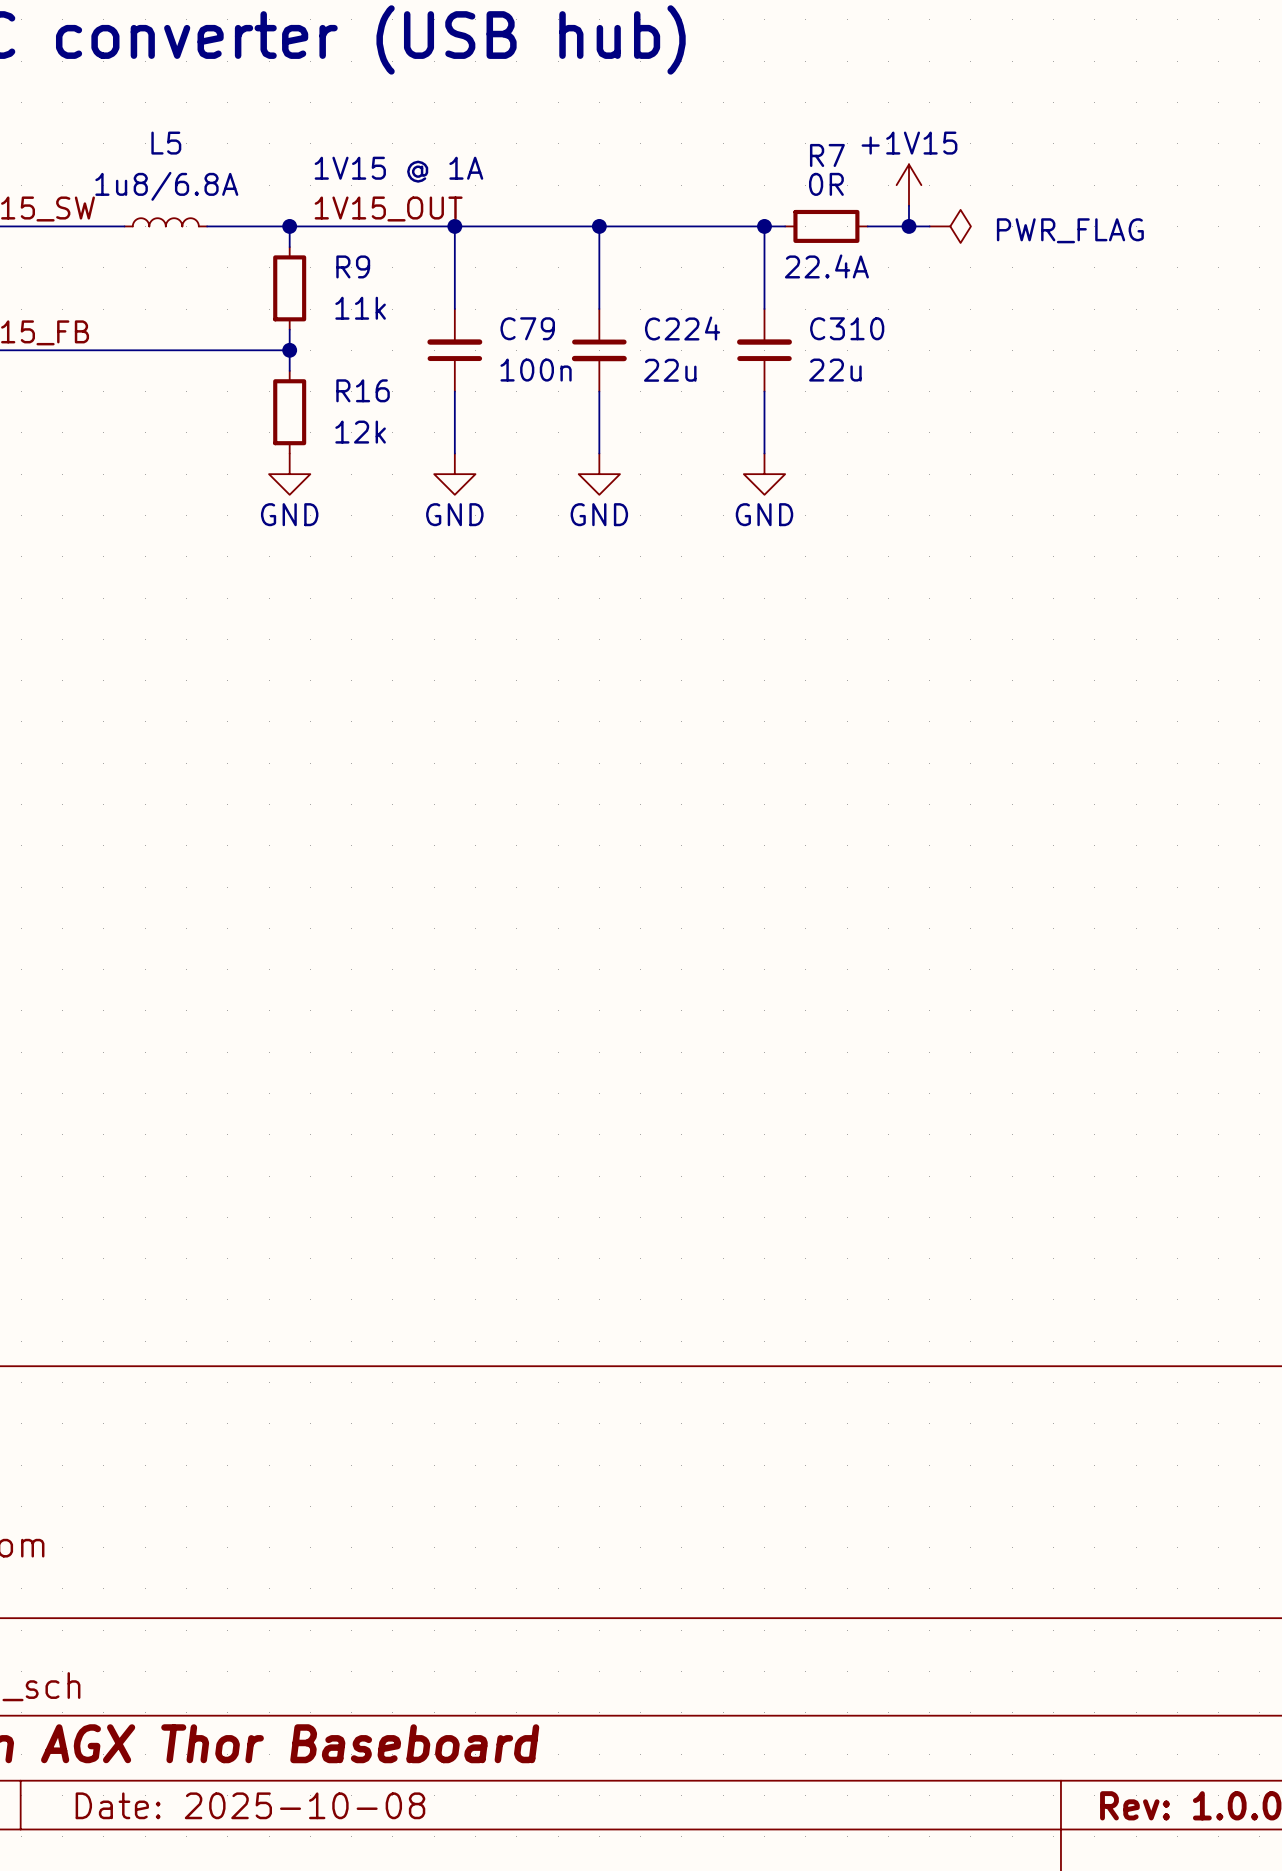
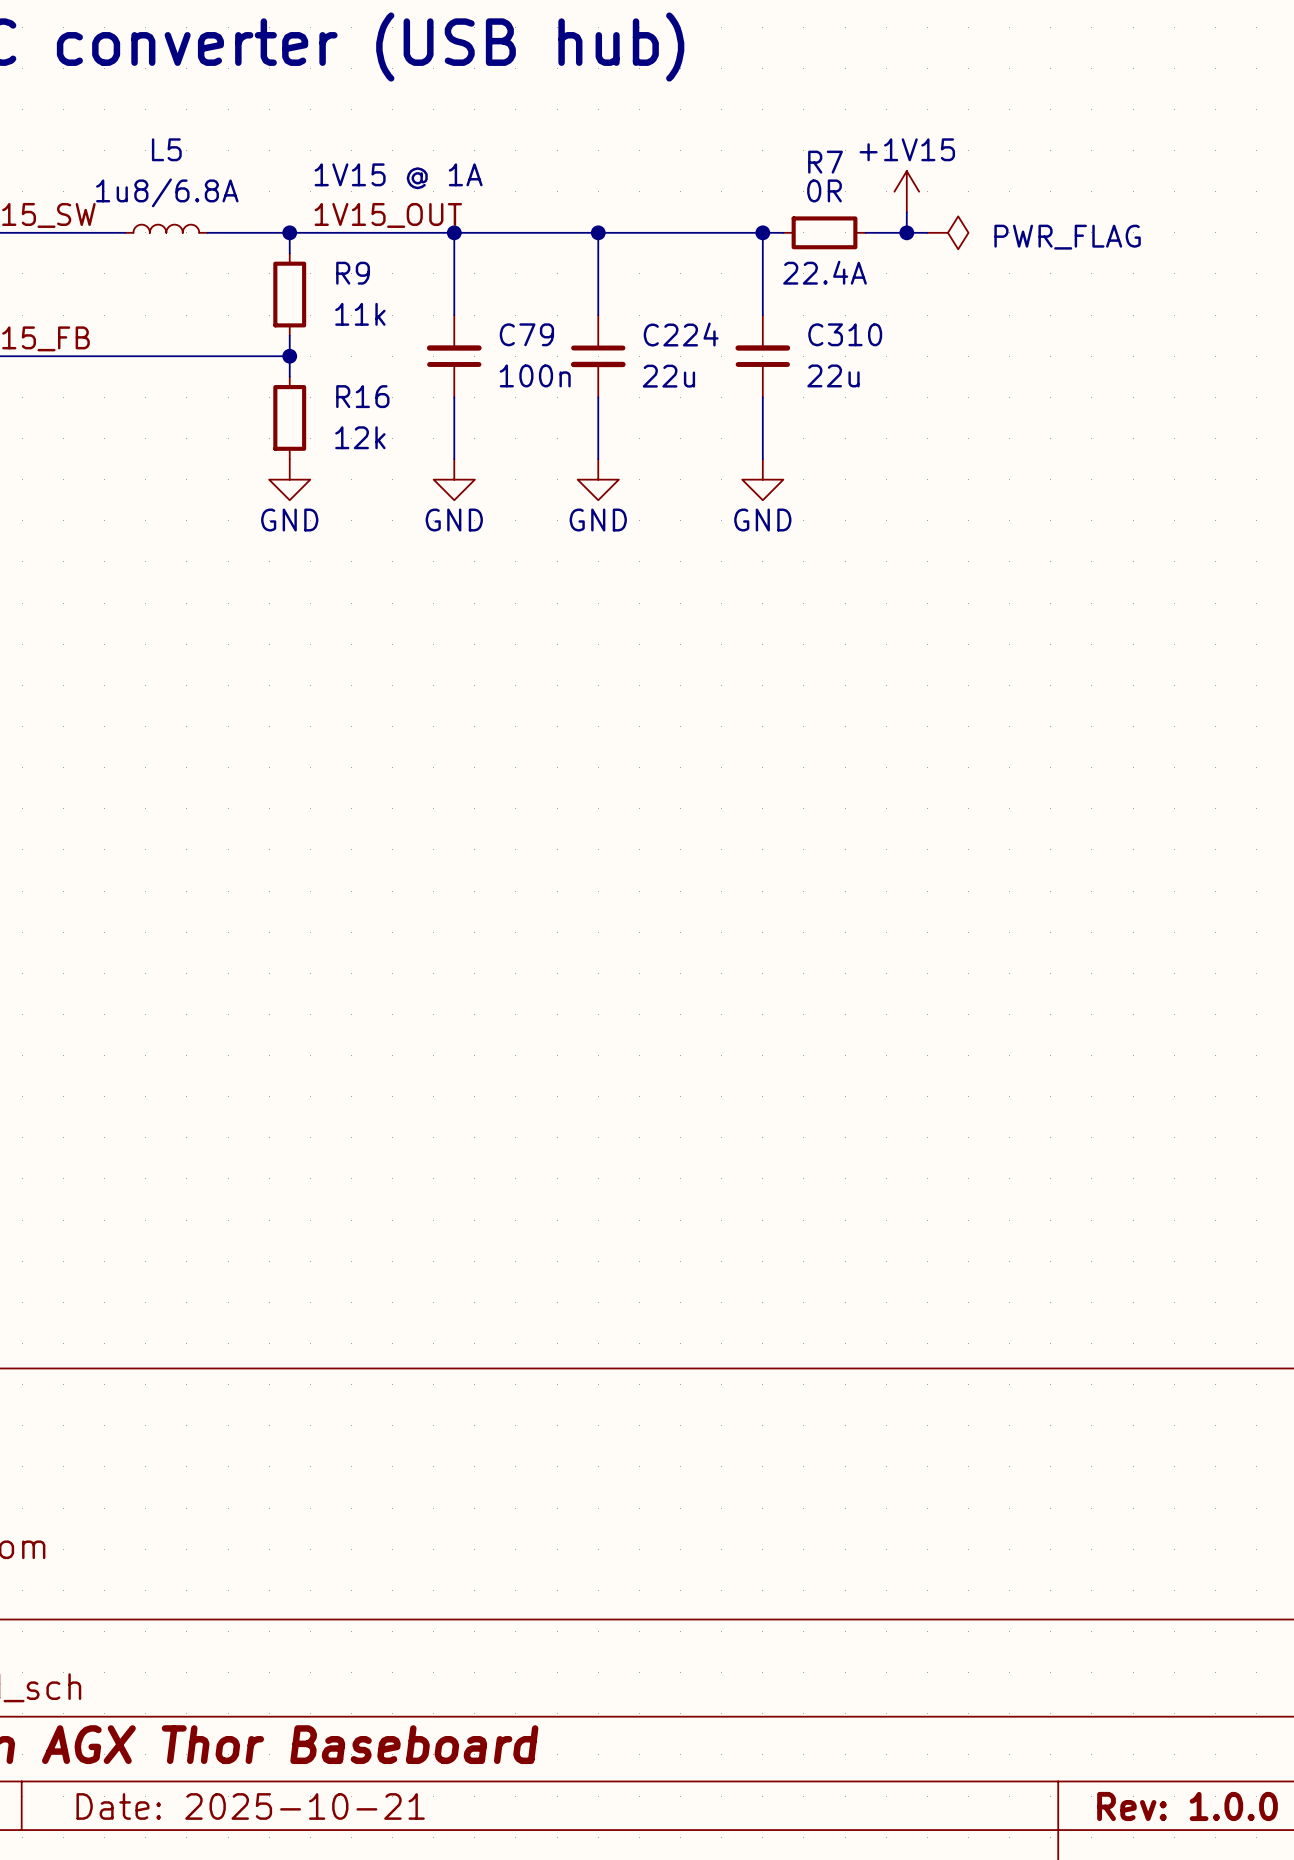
title block: Date: 2025-10-08 (250, 1805) -> Date: 2025-10-21 (250, 1806)

